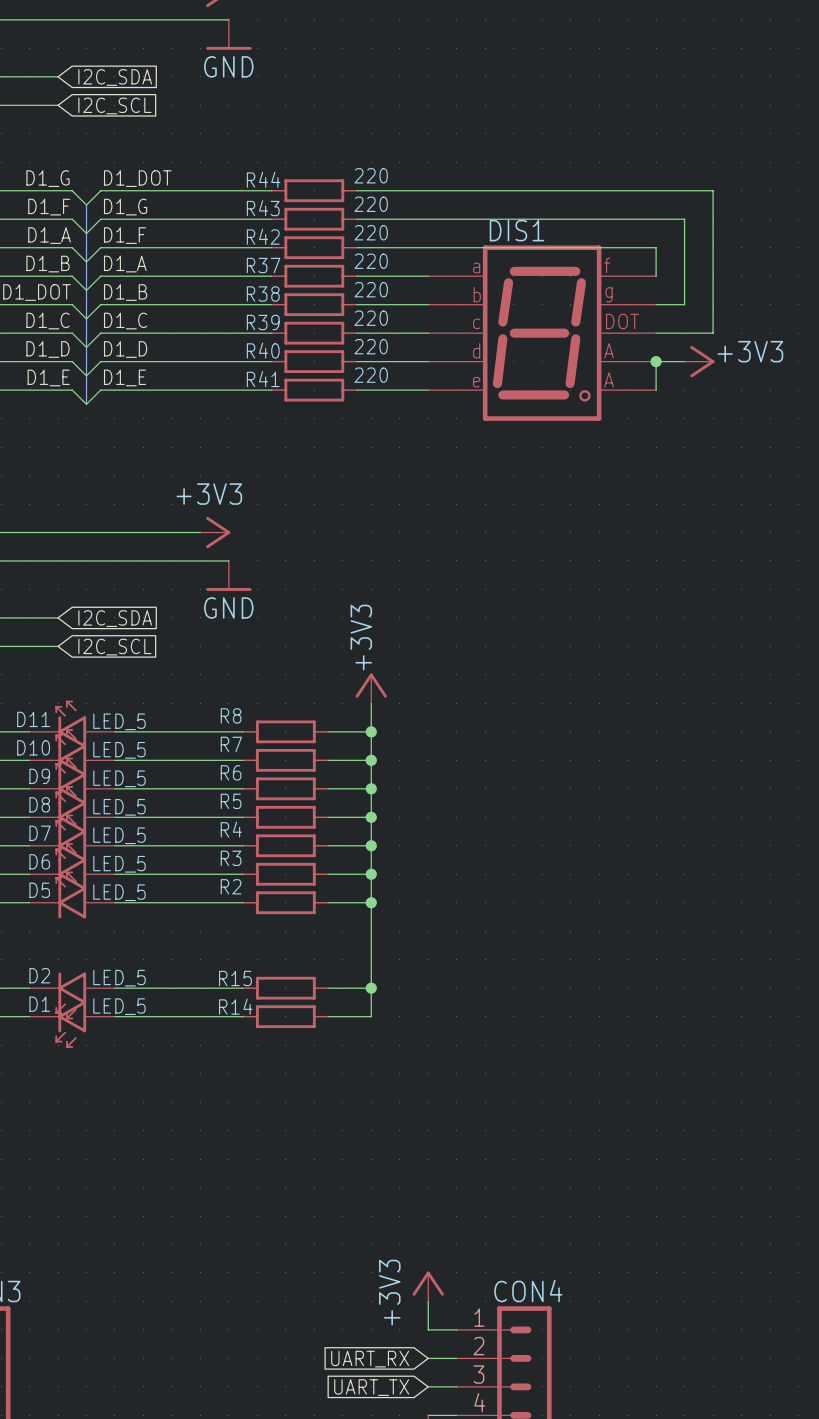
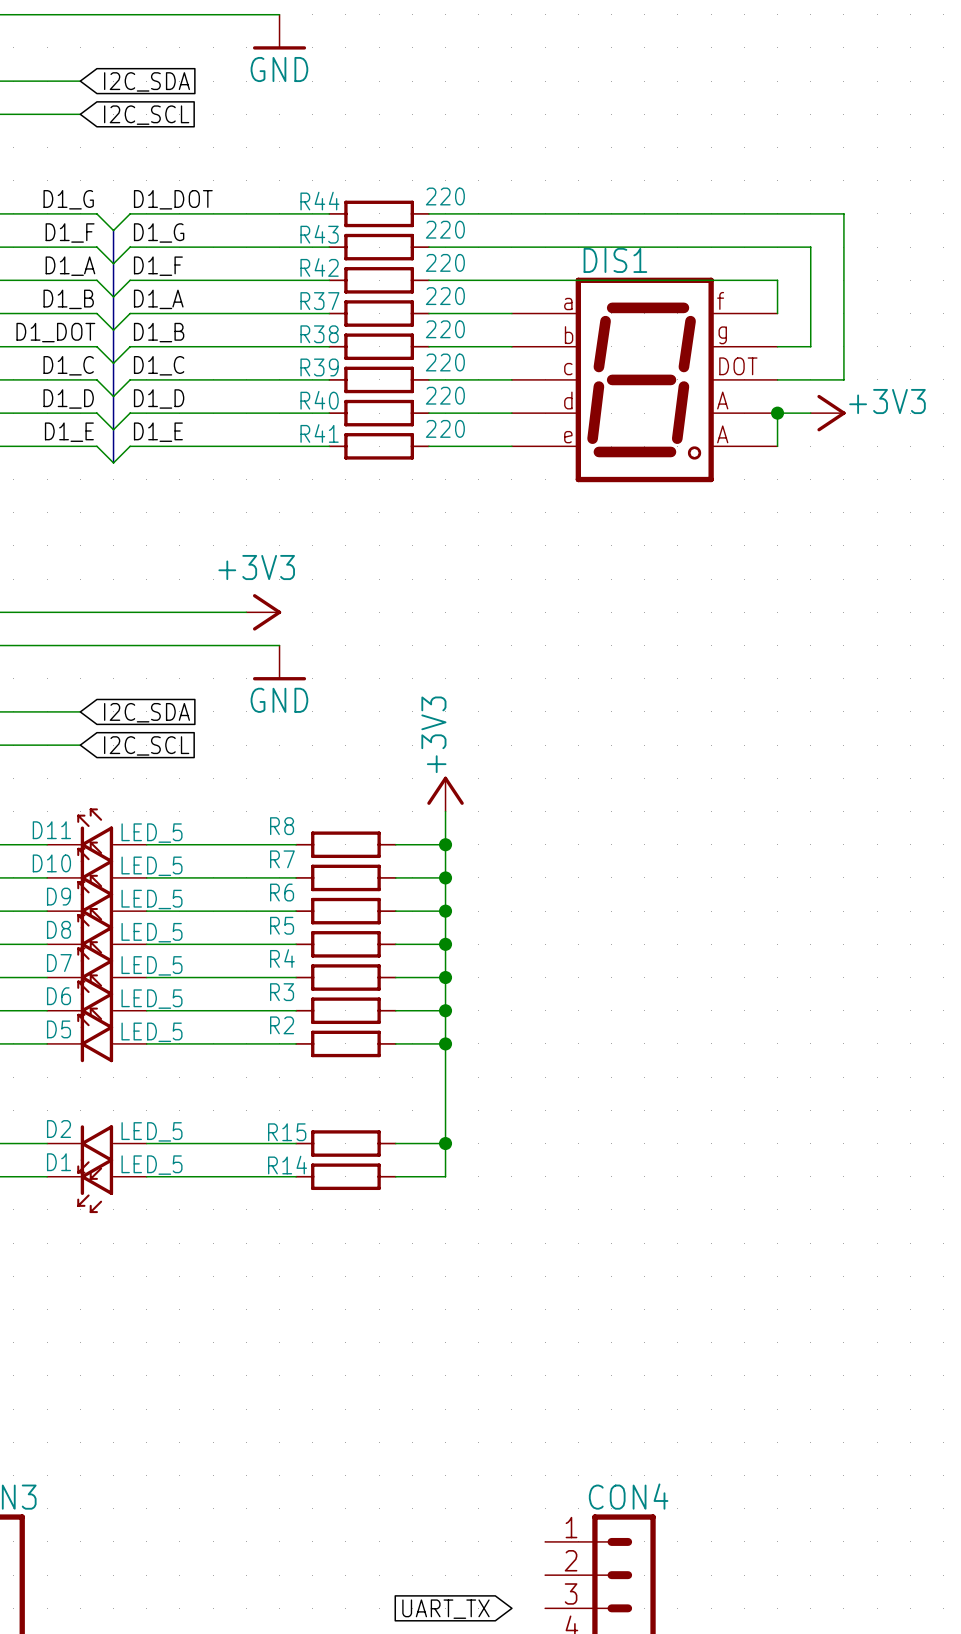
power symbol: +3V3 (428, 1286) -> none
wire: (428, 1301) (428, 1329) (456, 1329) -> none
wire: (428, 1358) (456, 1358) -> none
global label: UART_RX (370, 1359) -> none
wire: (428, 1386) (456, 1386) -> none

